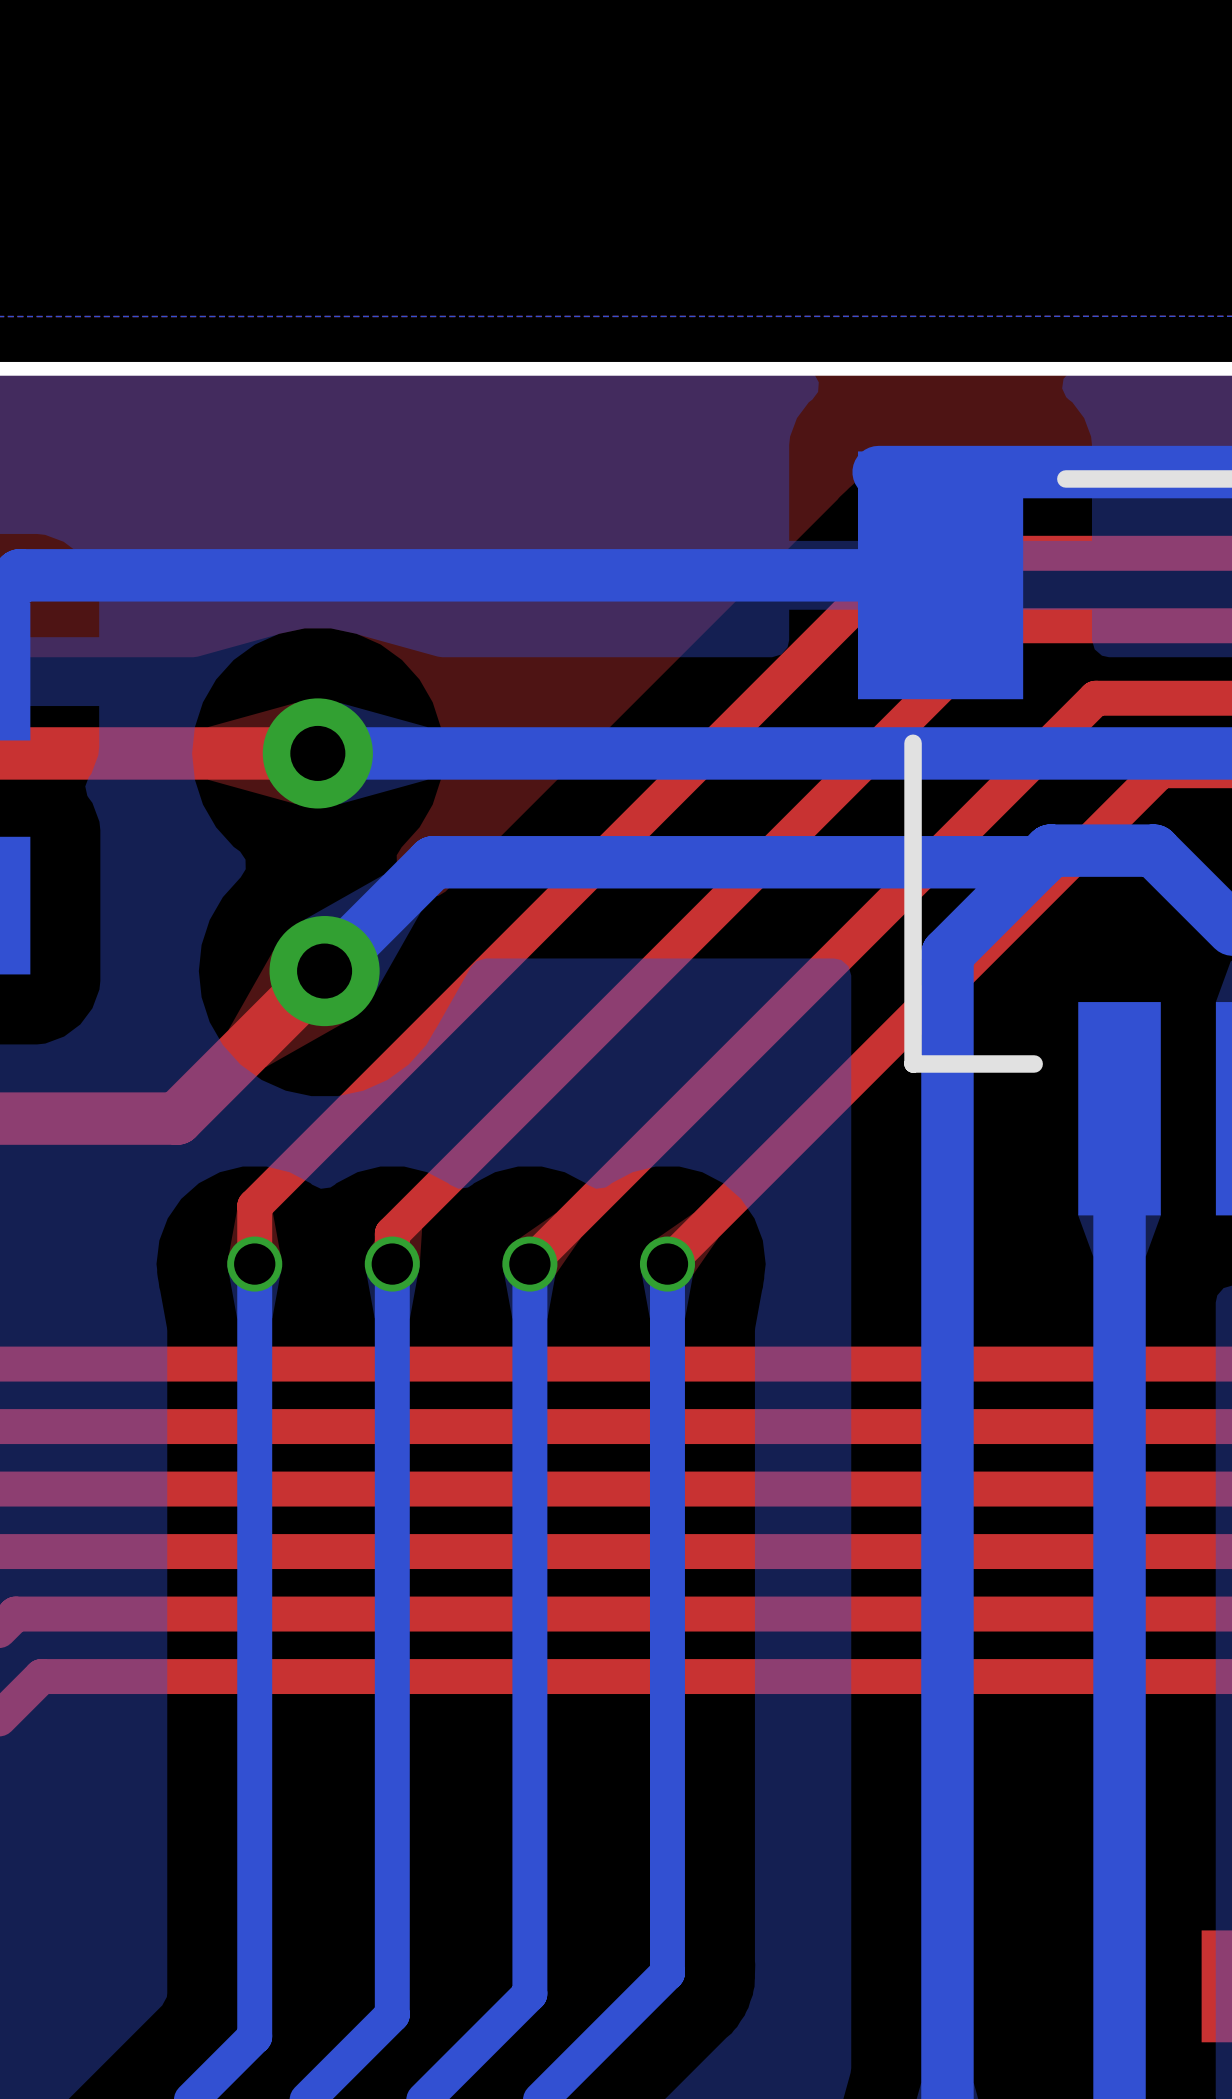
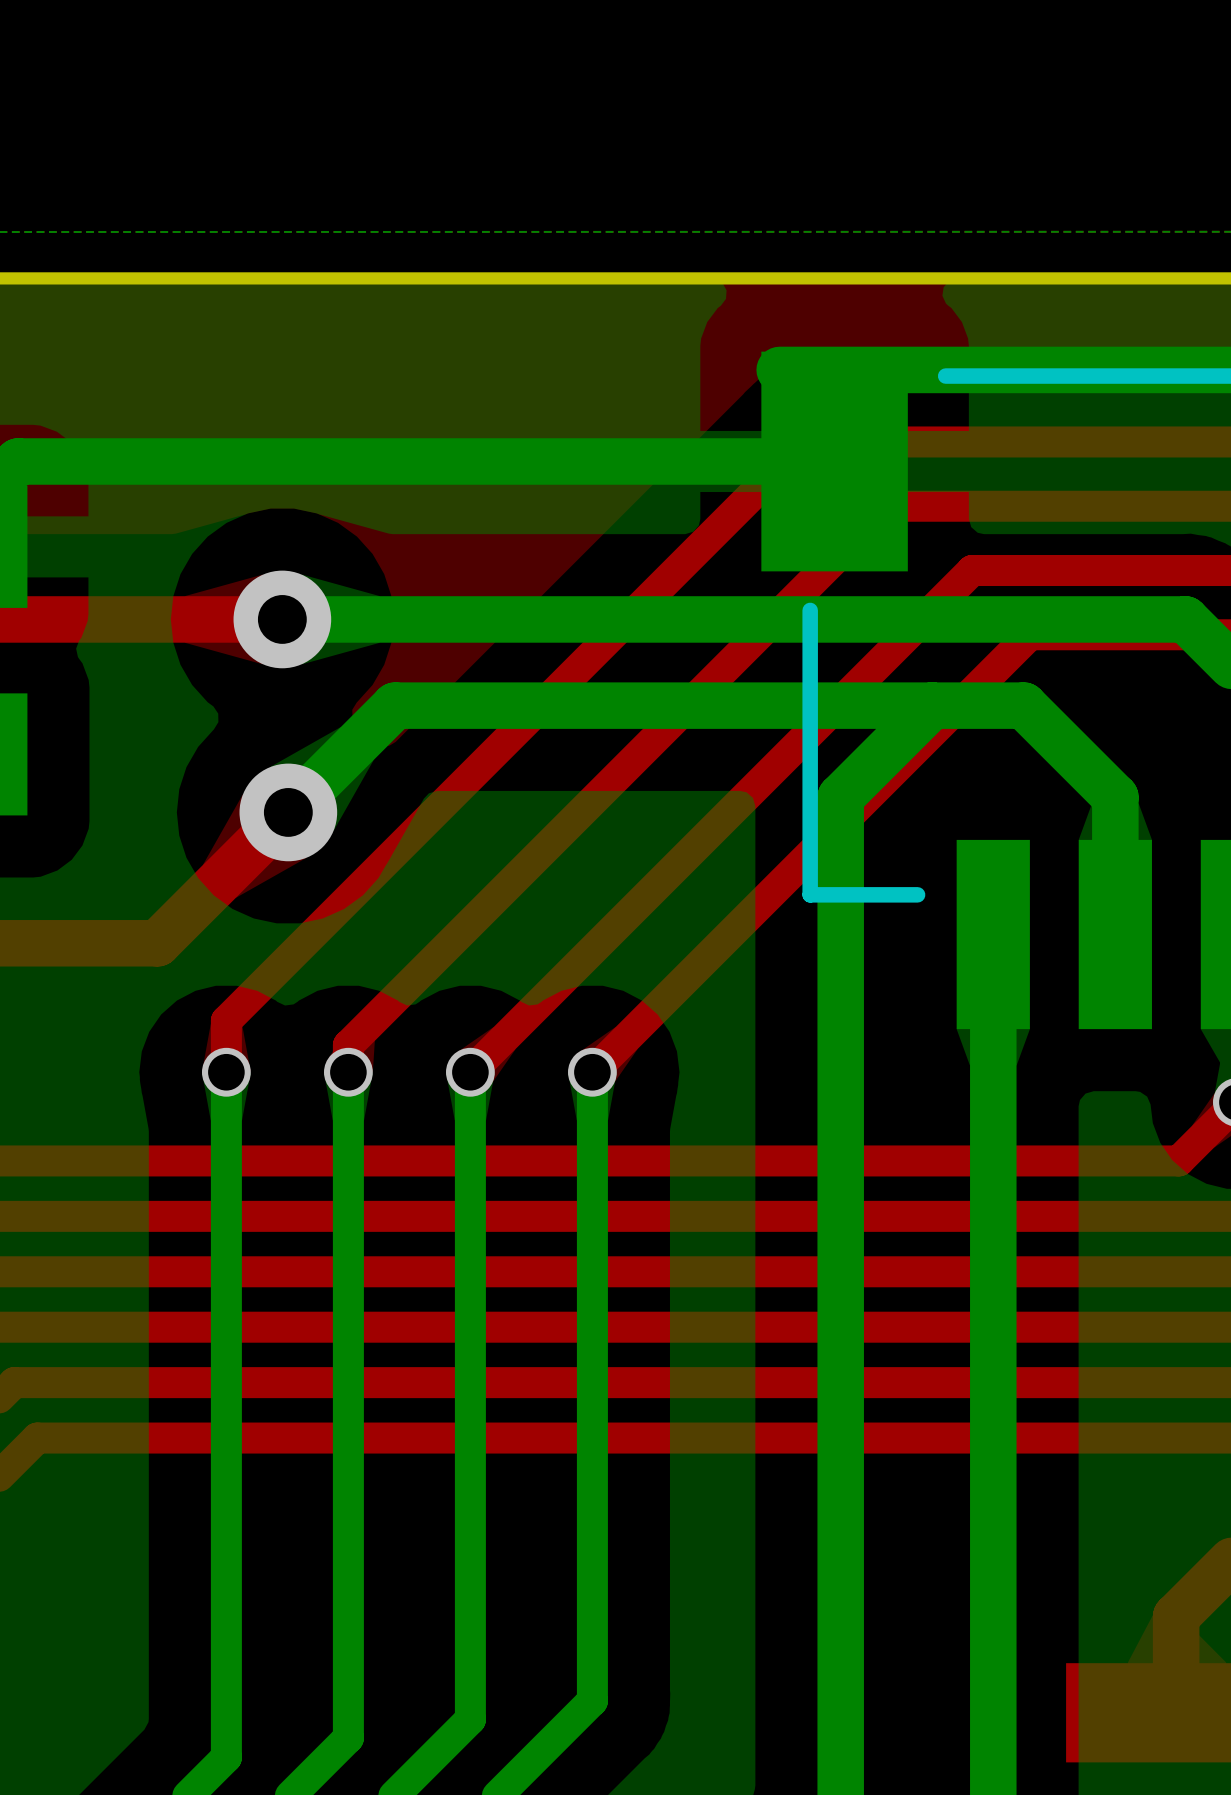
bottom track: (1039, 862) (433, 862) -> (932, 705) (395, 705) (384, 715)

